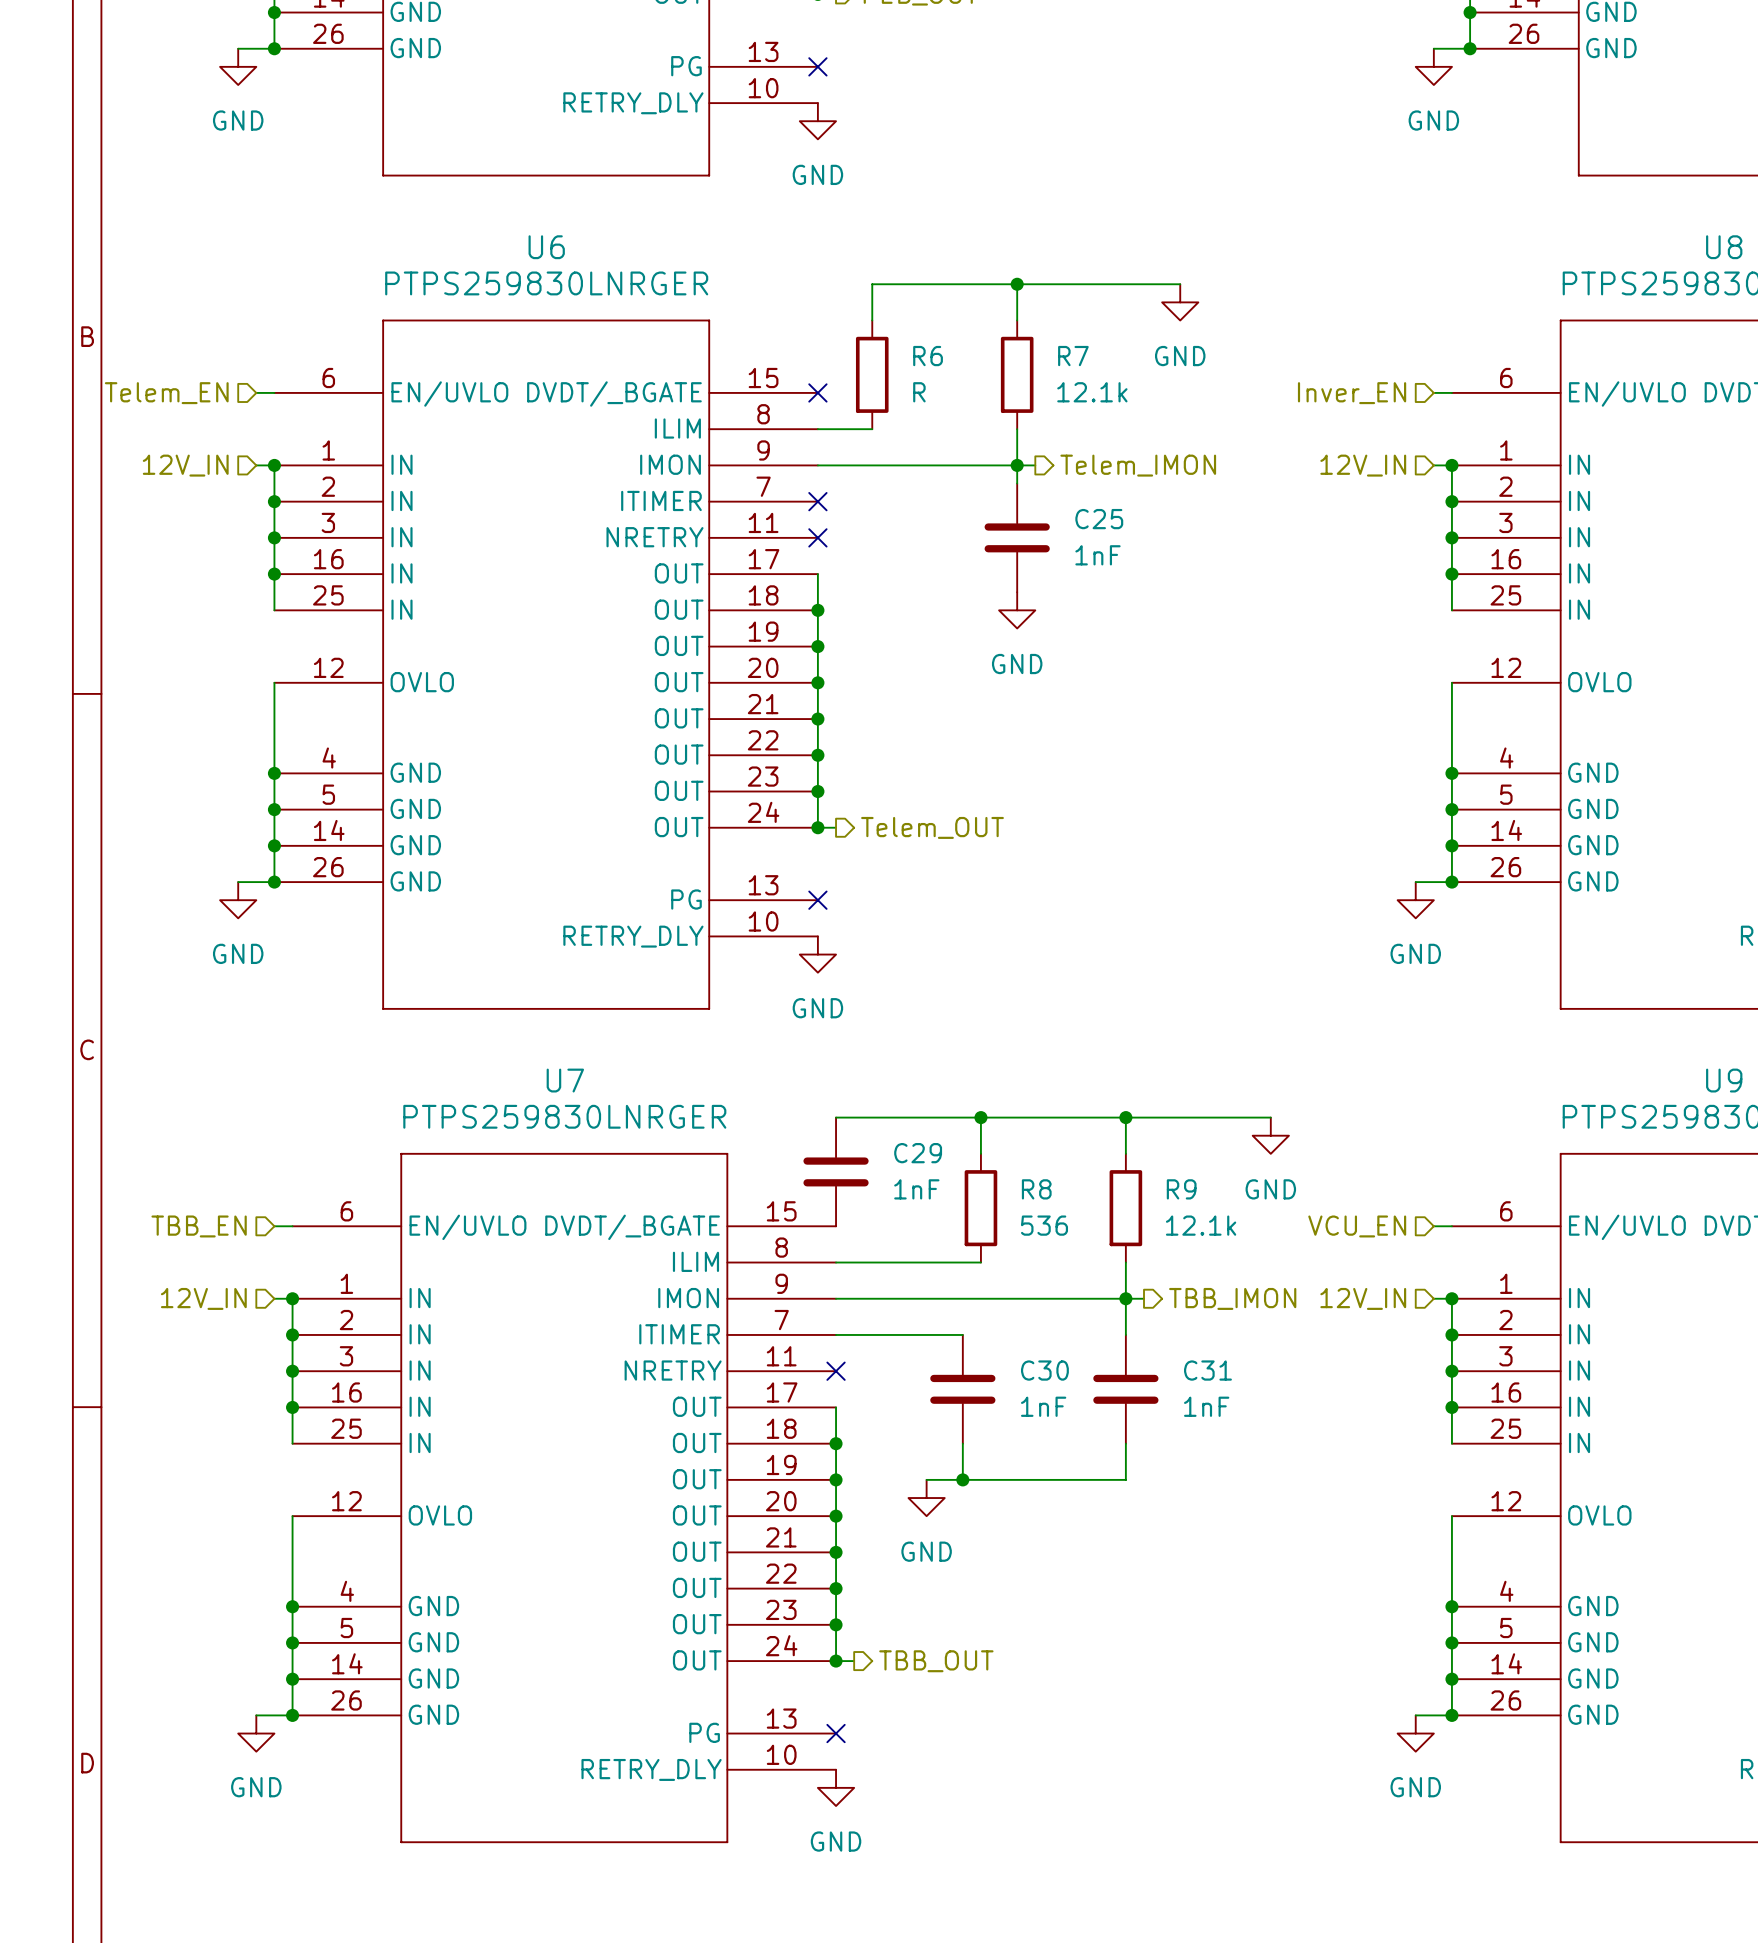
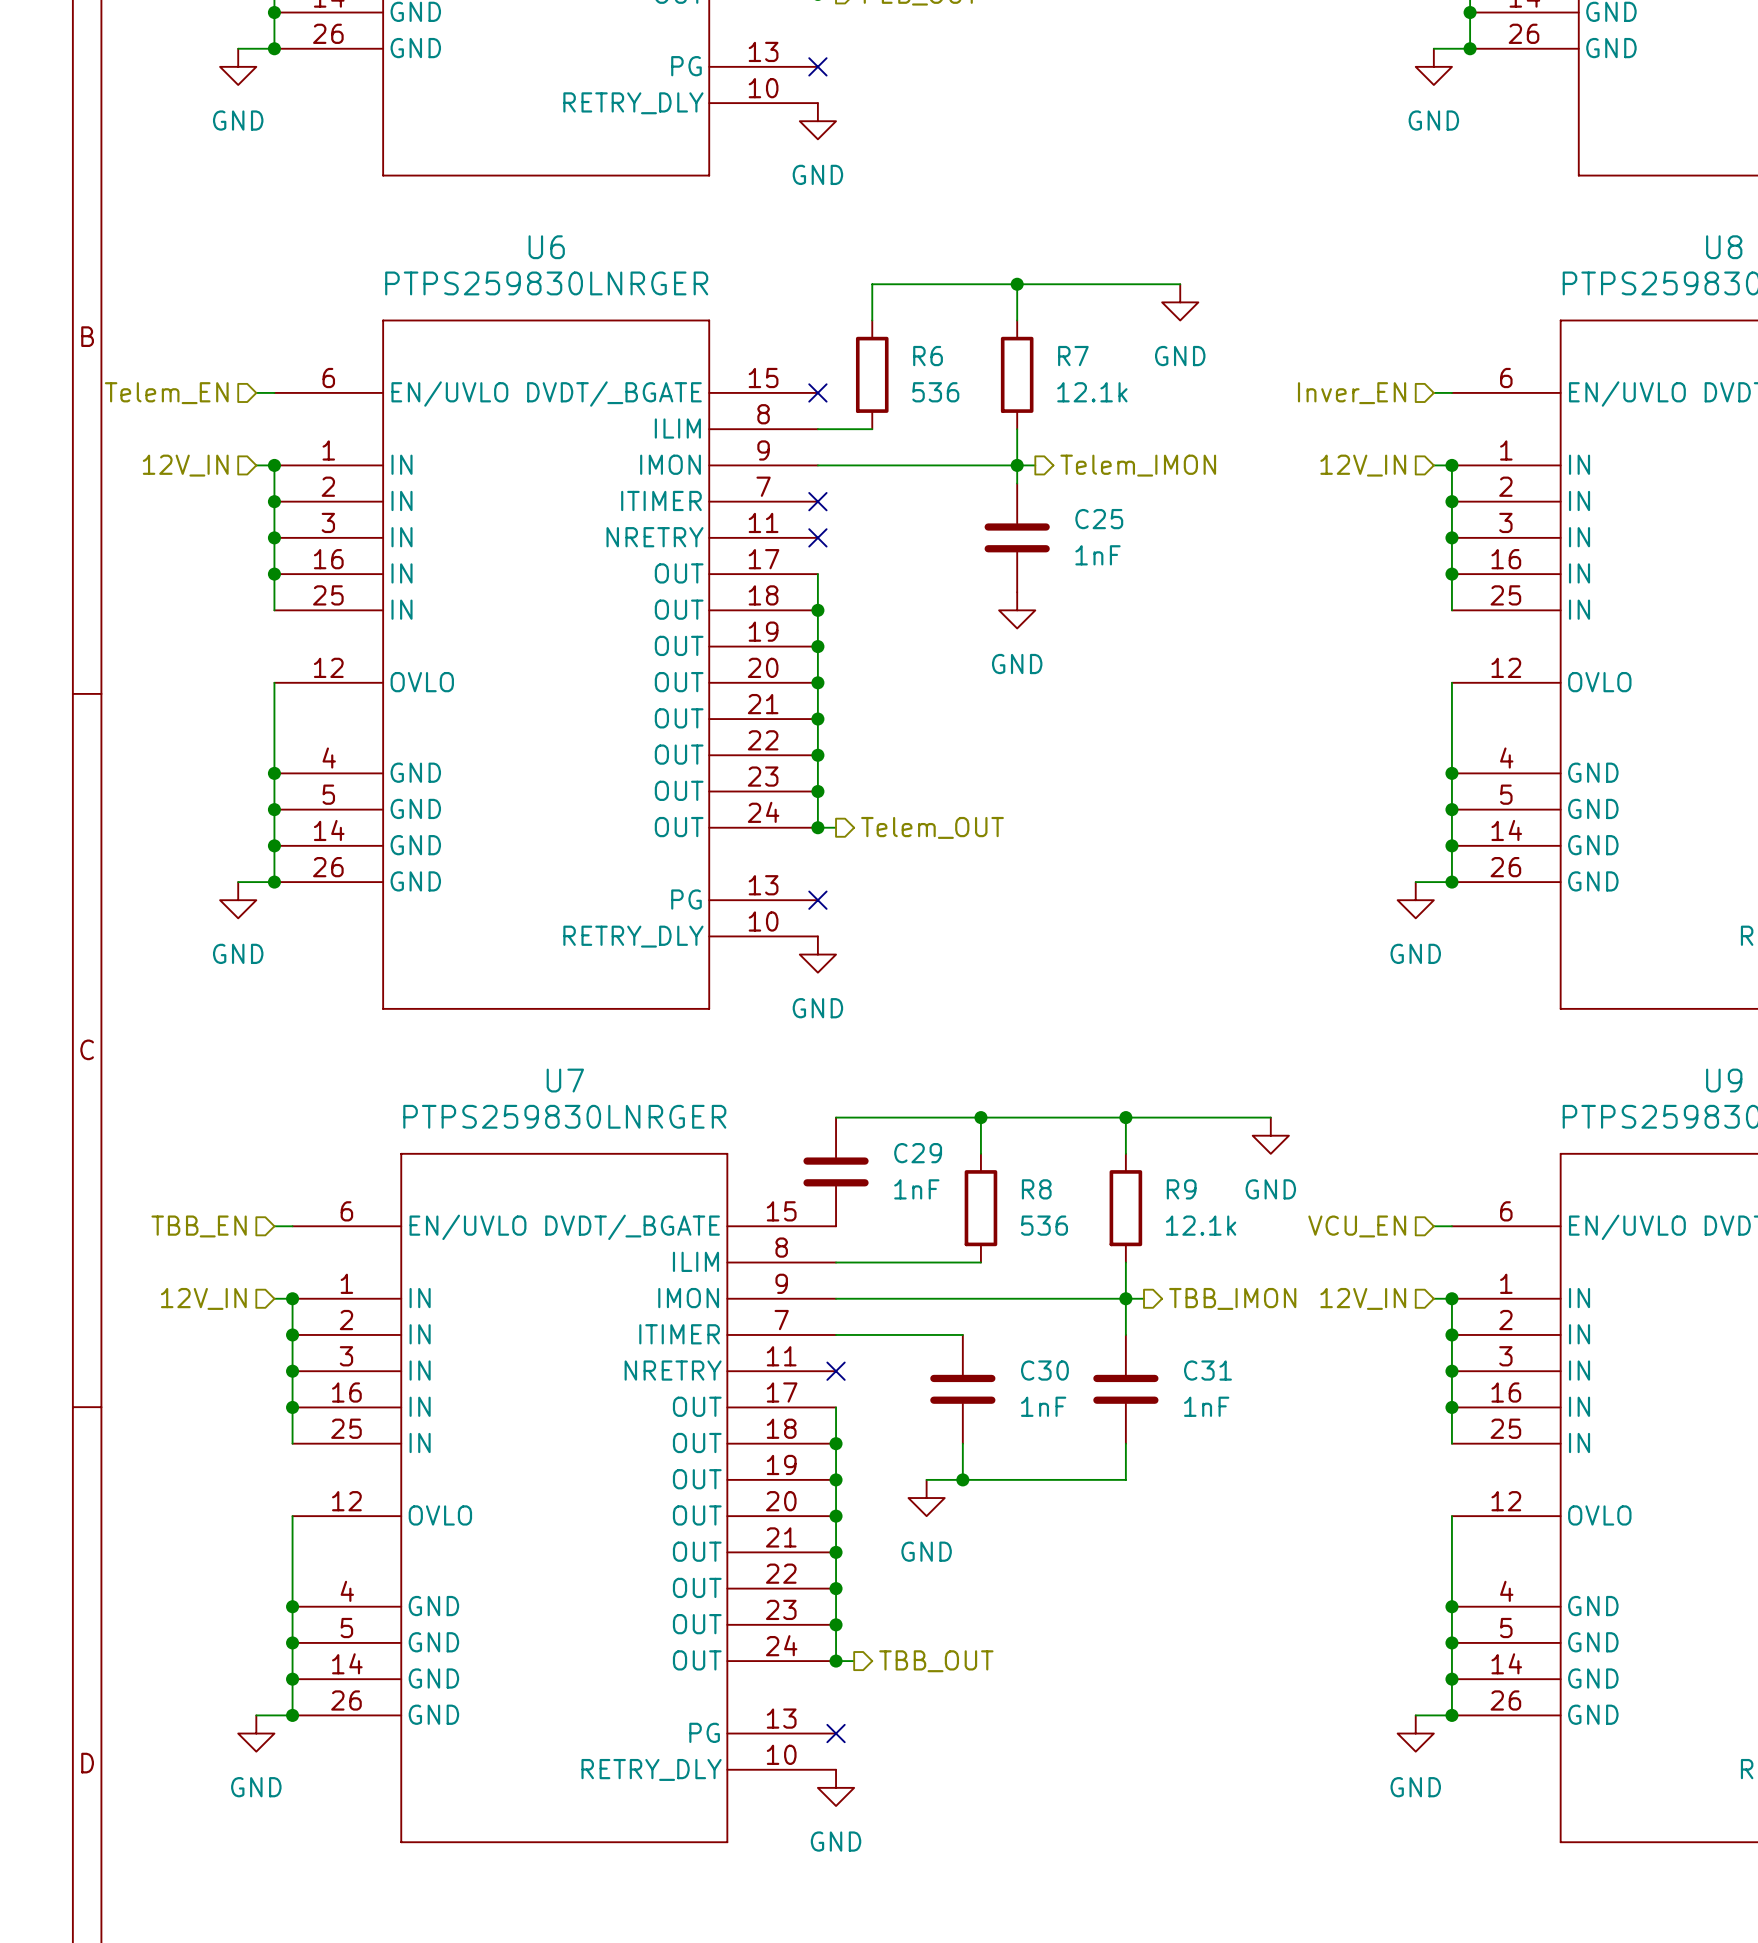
R6 value: R (919, 392) -> 536 (935, 392)

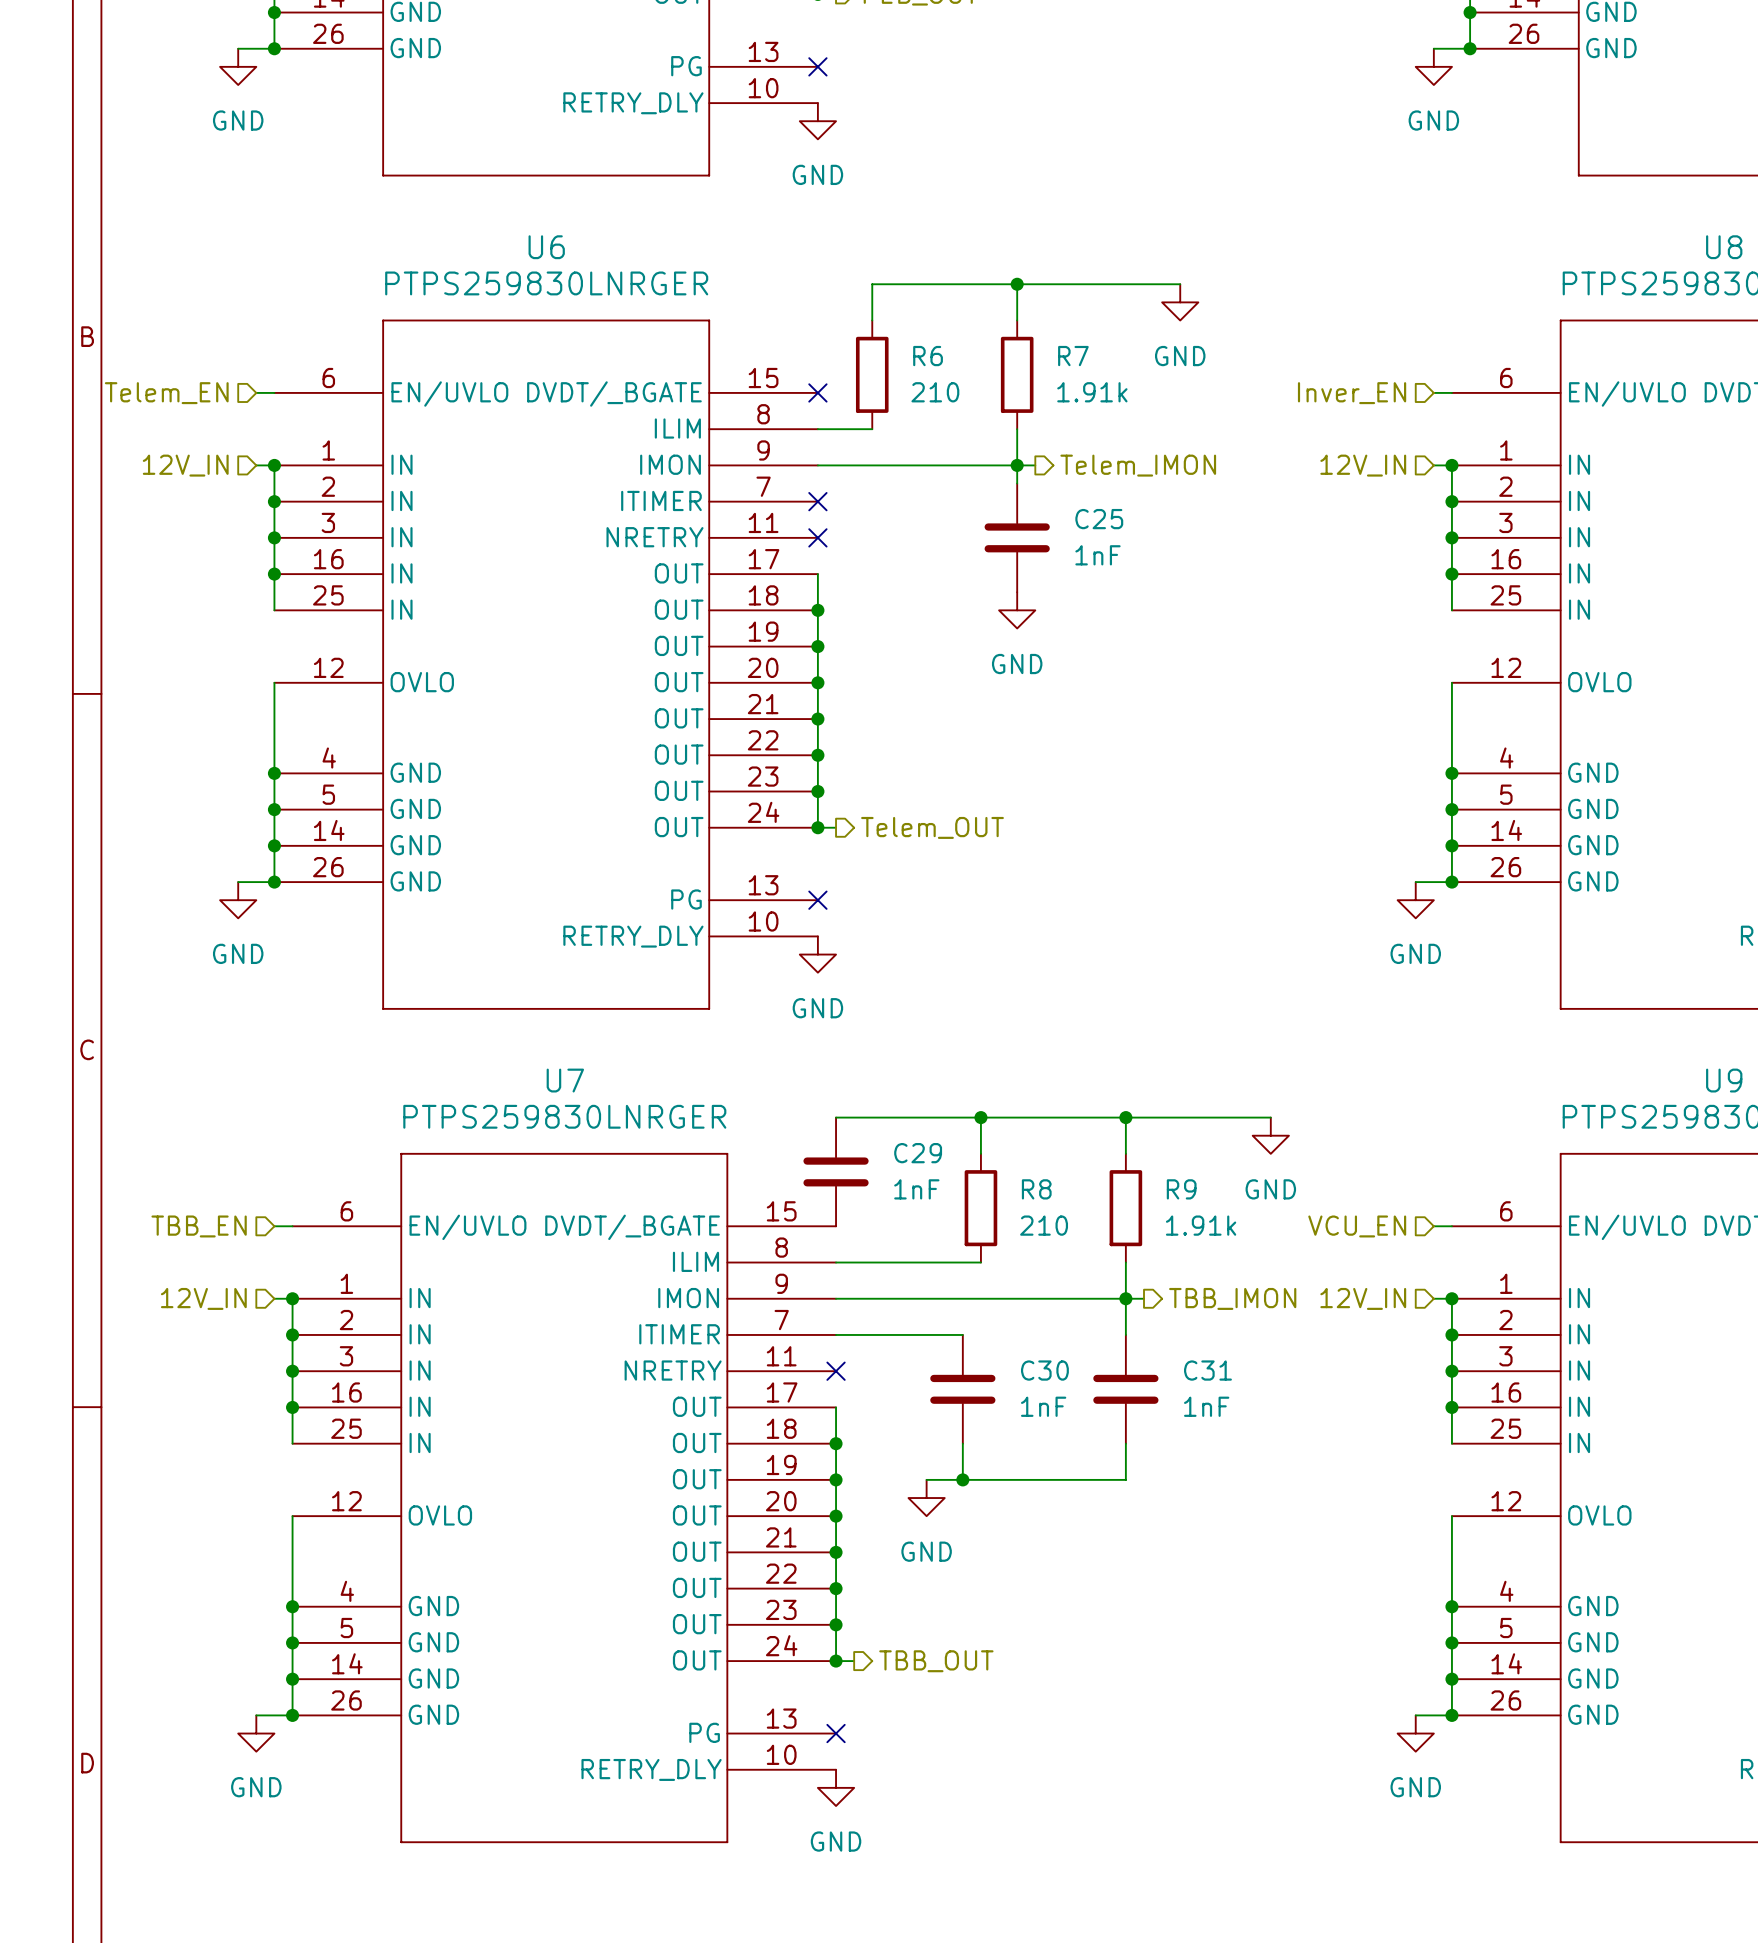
R6 value: 536 (935, 392) -> 210 (935, 392)
R7 value: 12.1k (1092, 392) -> 1.91k (1092, 392)
R8 value: 536 (1044, 1225) -> 210 (1044, 1225)
R9 value: 12.1k (1201, 1225) -> 1.91k (1201, 1225)

